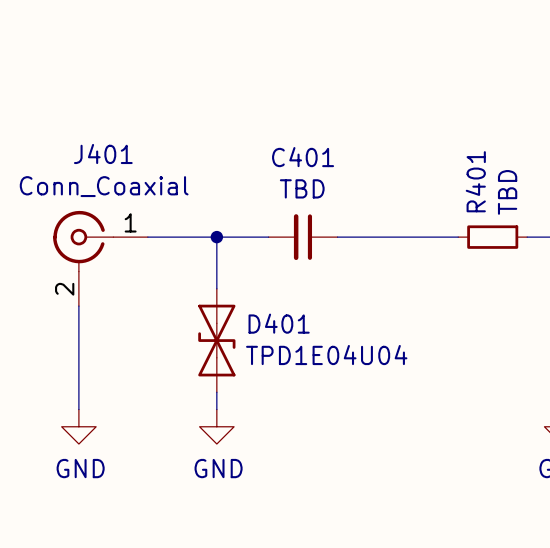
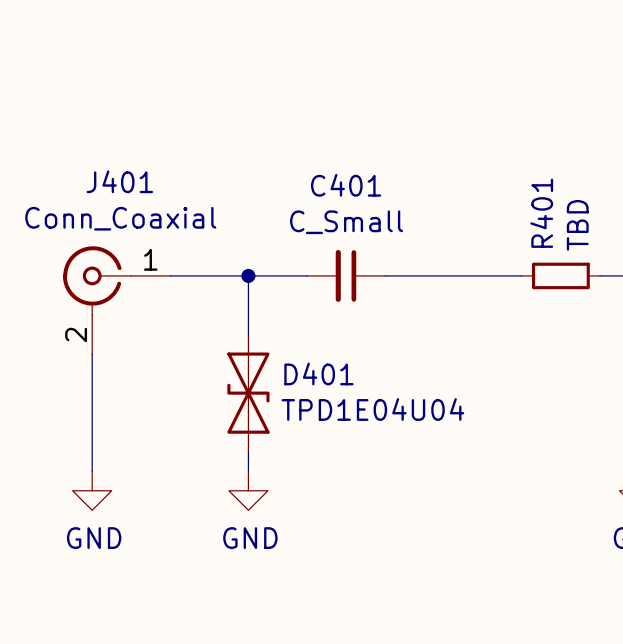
C401 value: TBD (302, 188) -> C_Small (346, 222)

